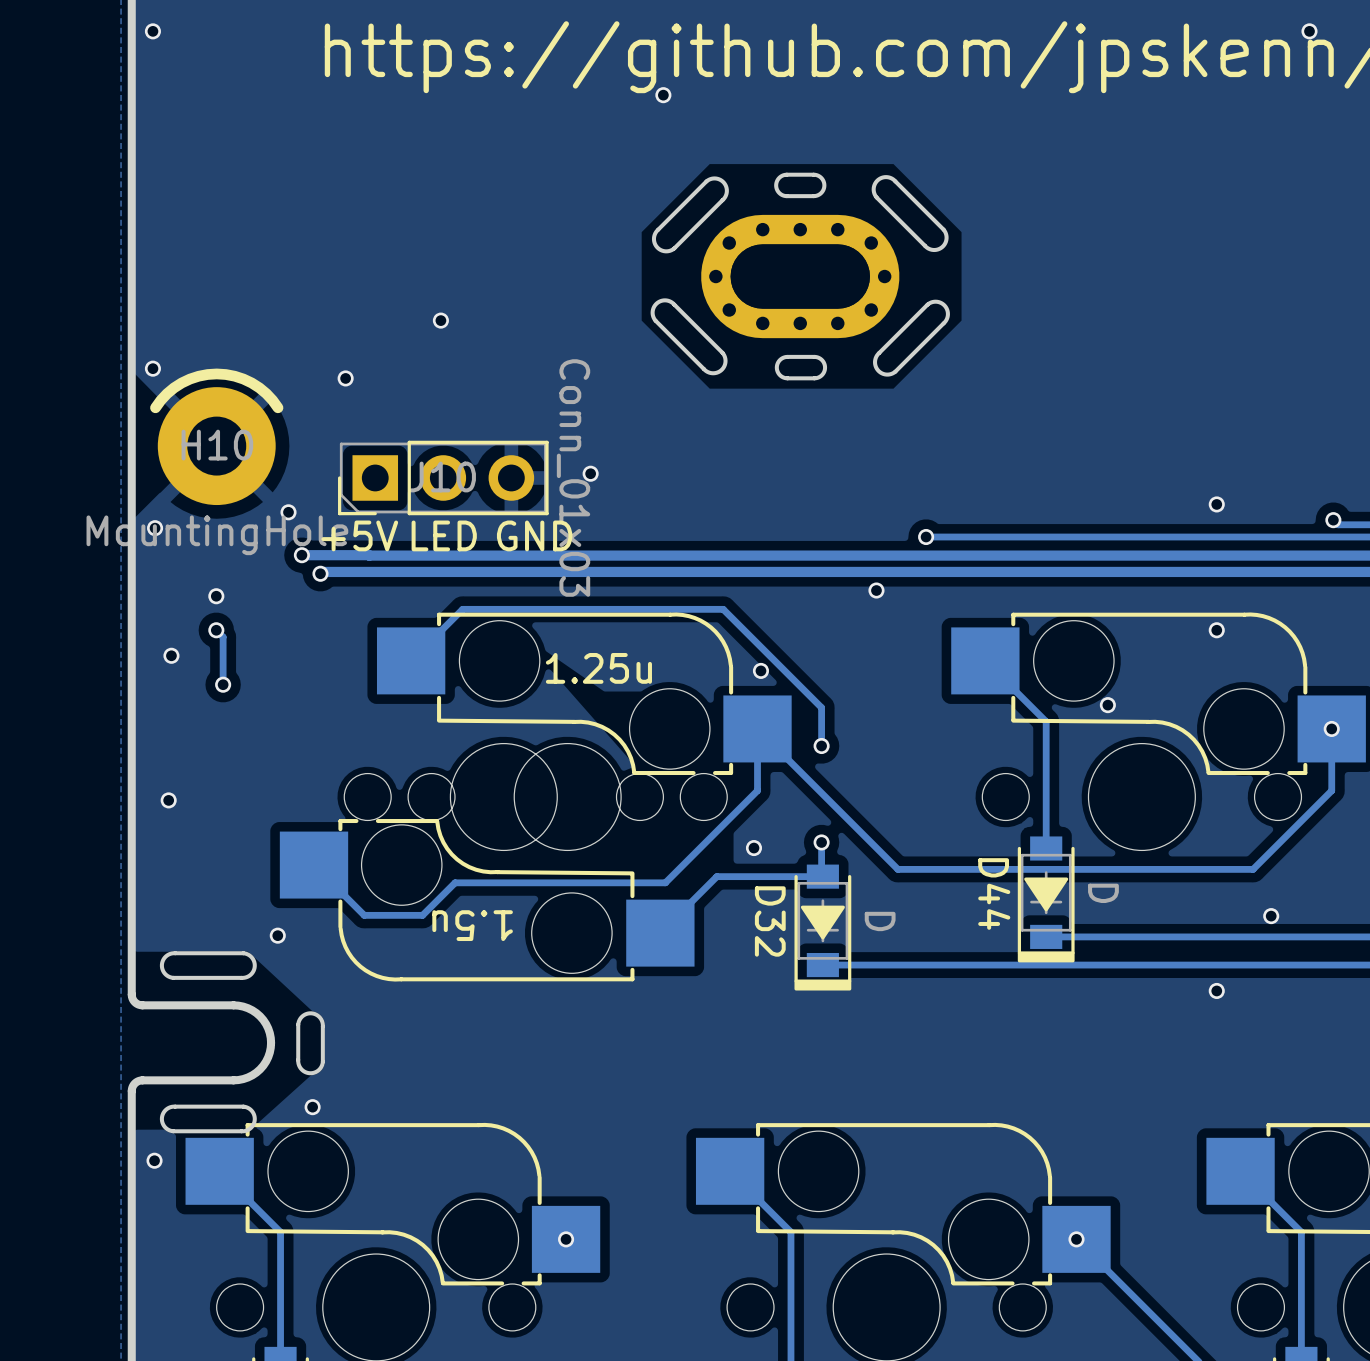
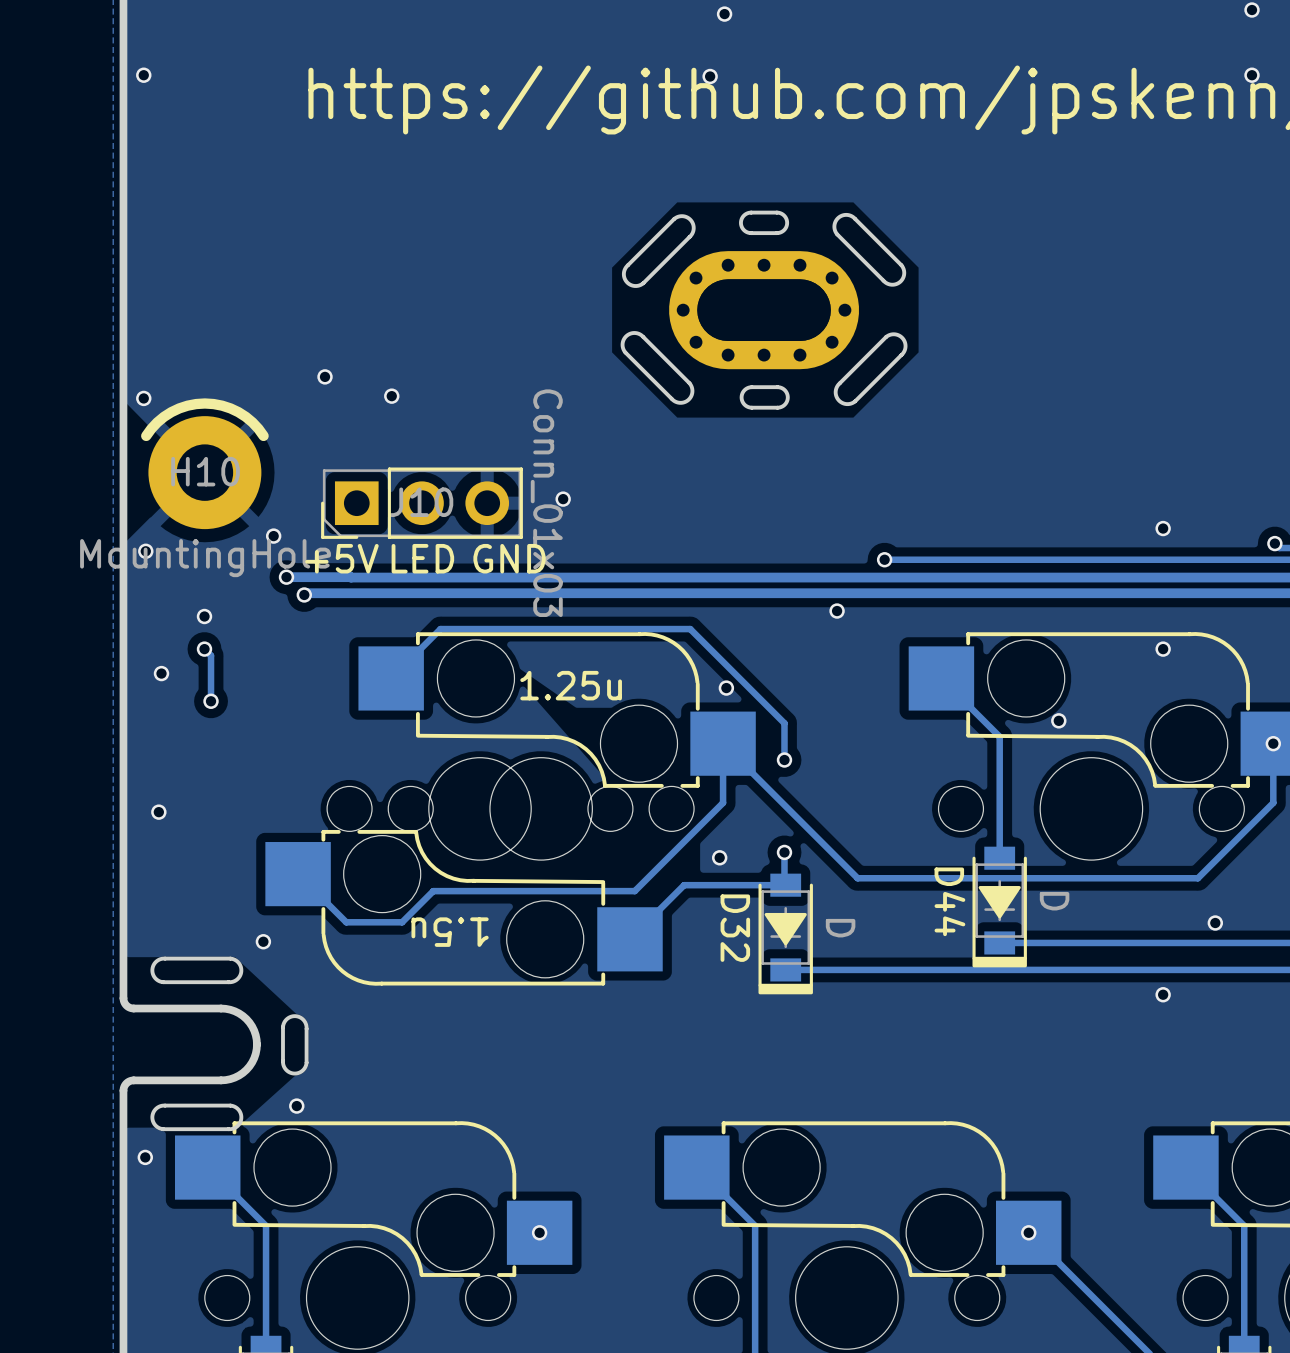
via position: (663, 95) -> (710, 76)
via: (440, 320) -> none
via: none -> (391, 396)
via position: (345, 378) -> (325, 376)

